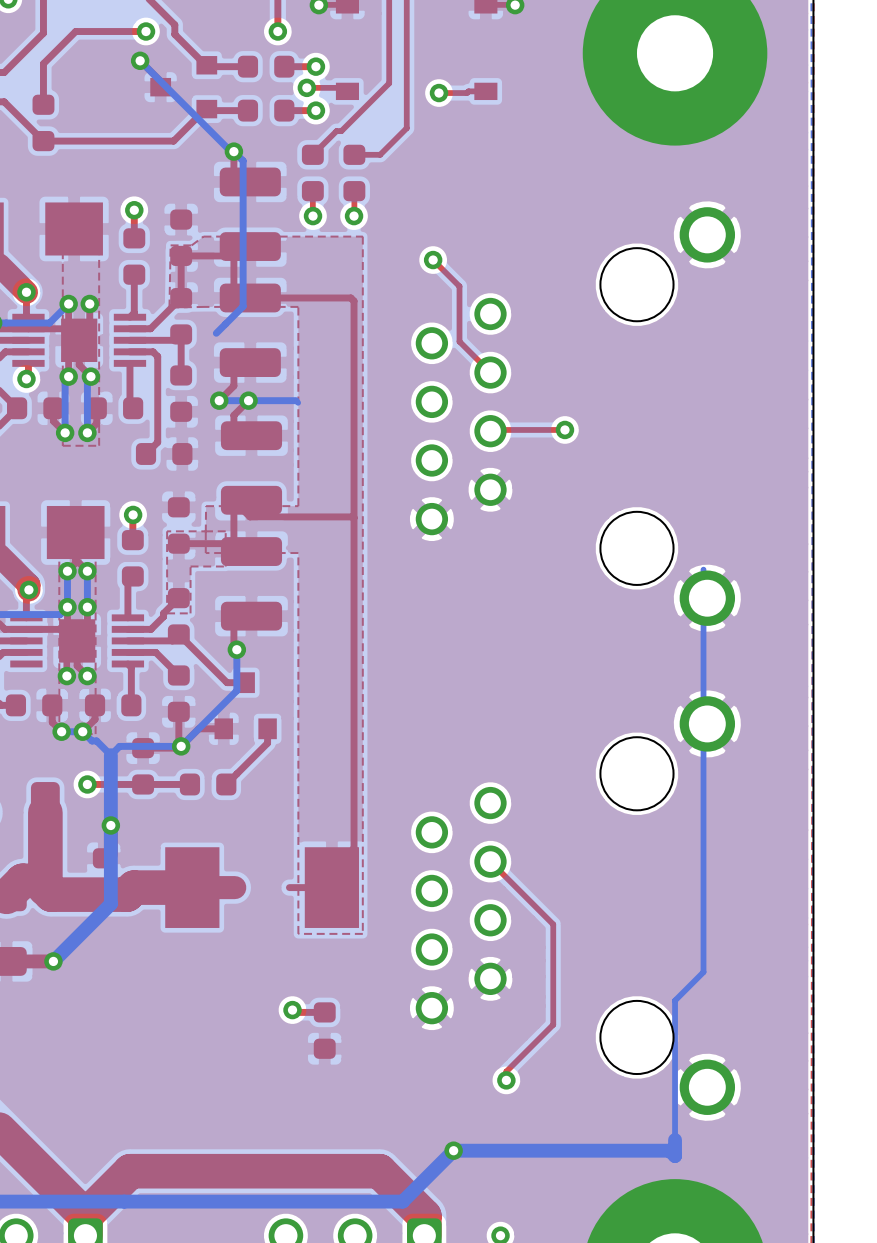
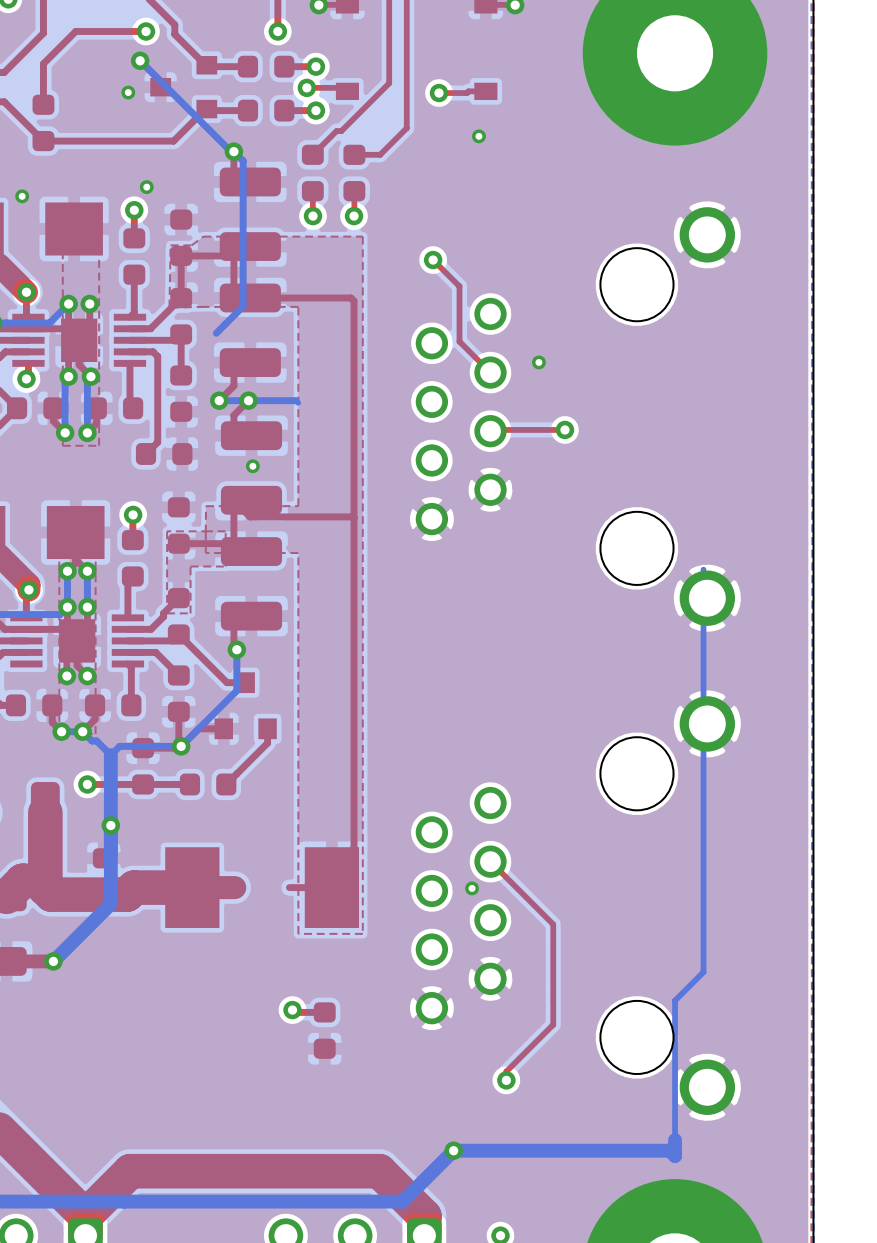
via: none -> (128, 92)
via: none -> (478, 136)
via: none -> (146, 187)
via: none -> (22, 196)
via: none -> (538, 362)
via: none -> (252, 466)
via: none -> (472, 888)

